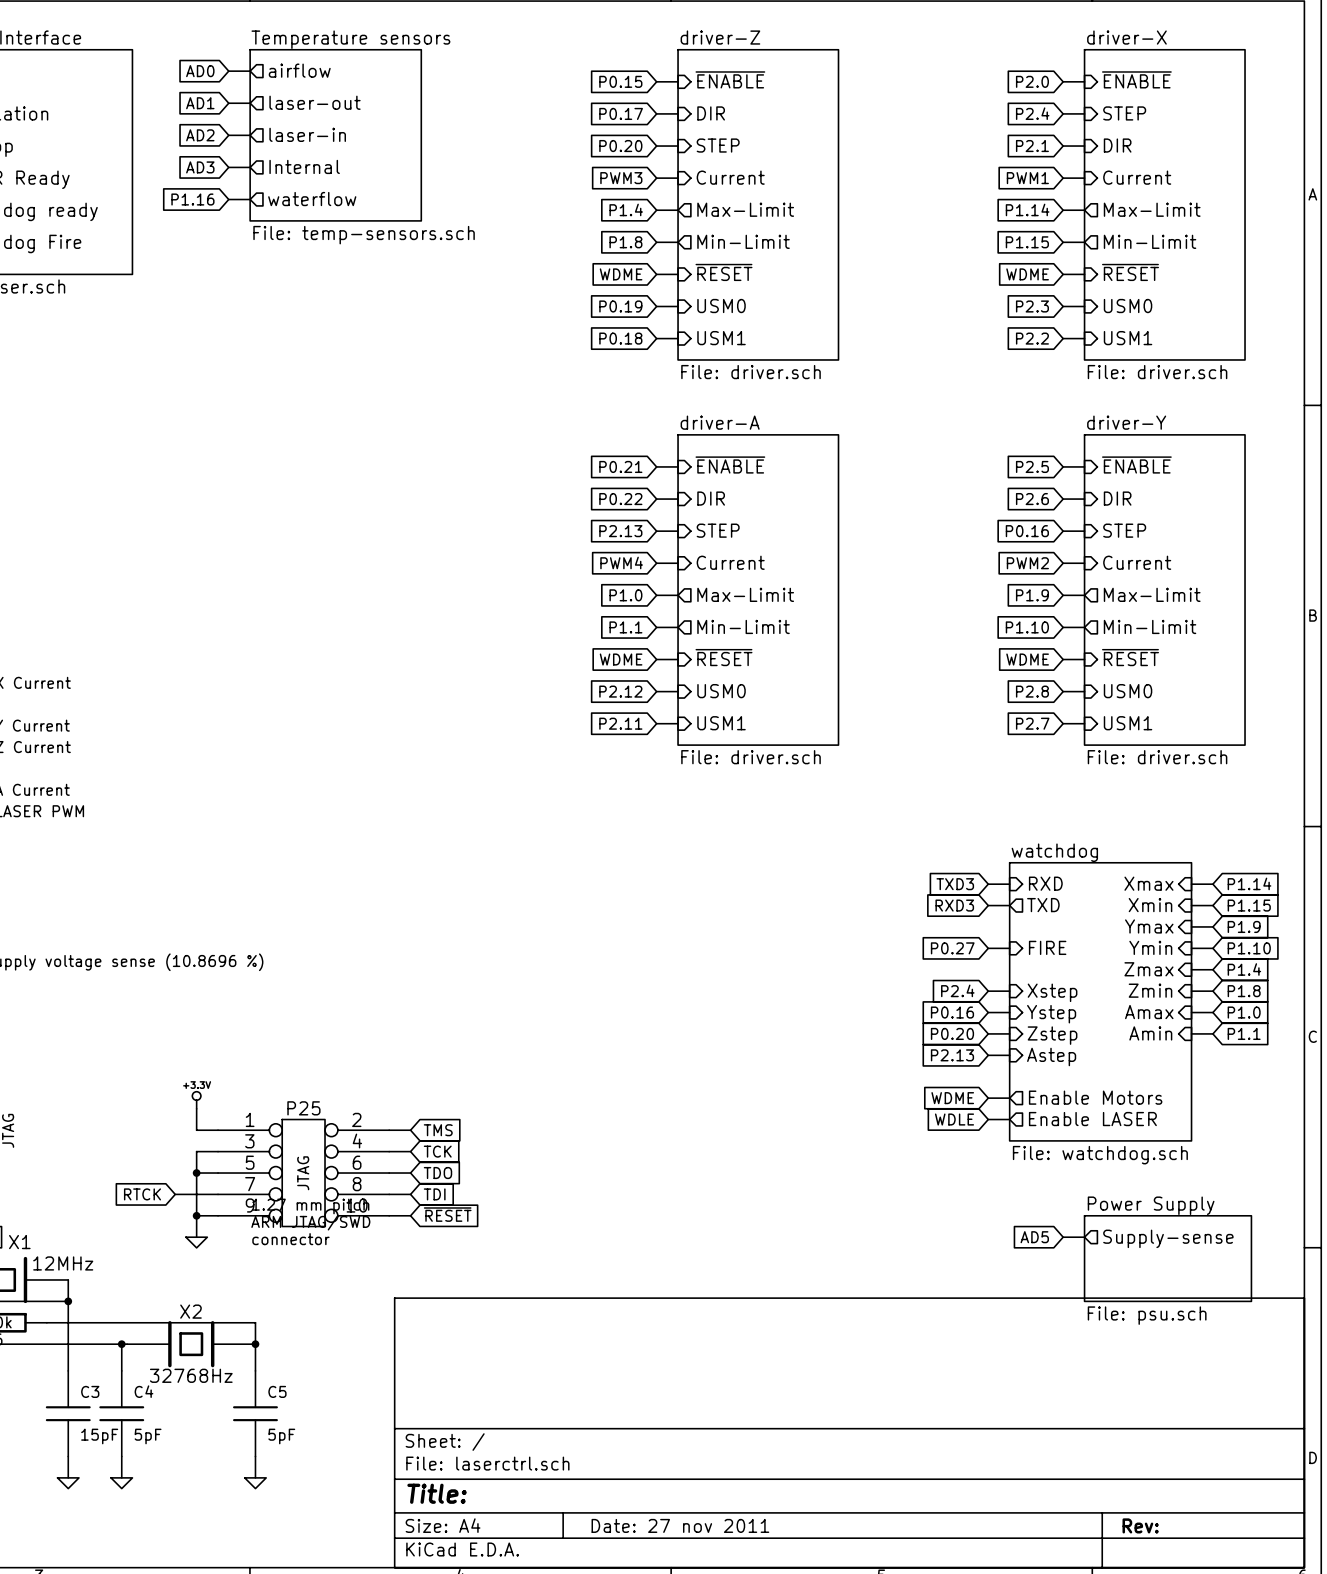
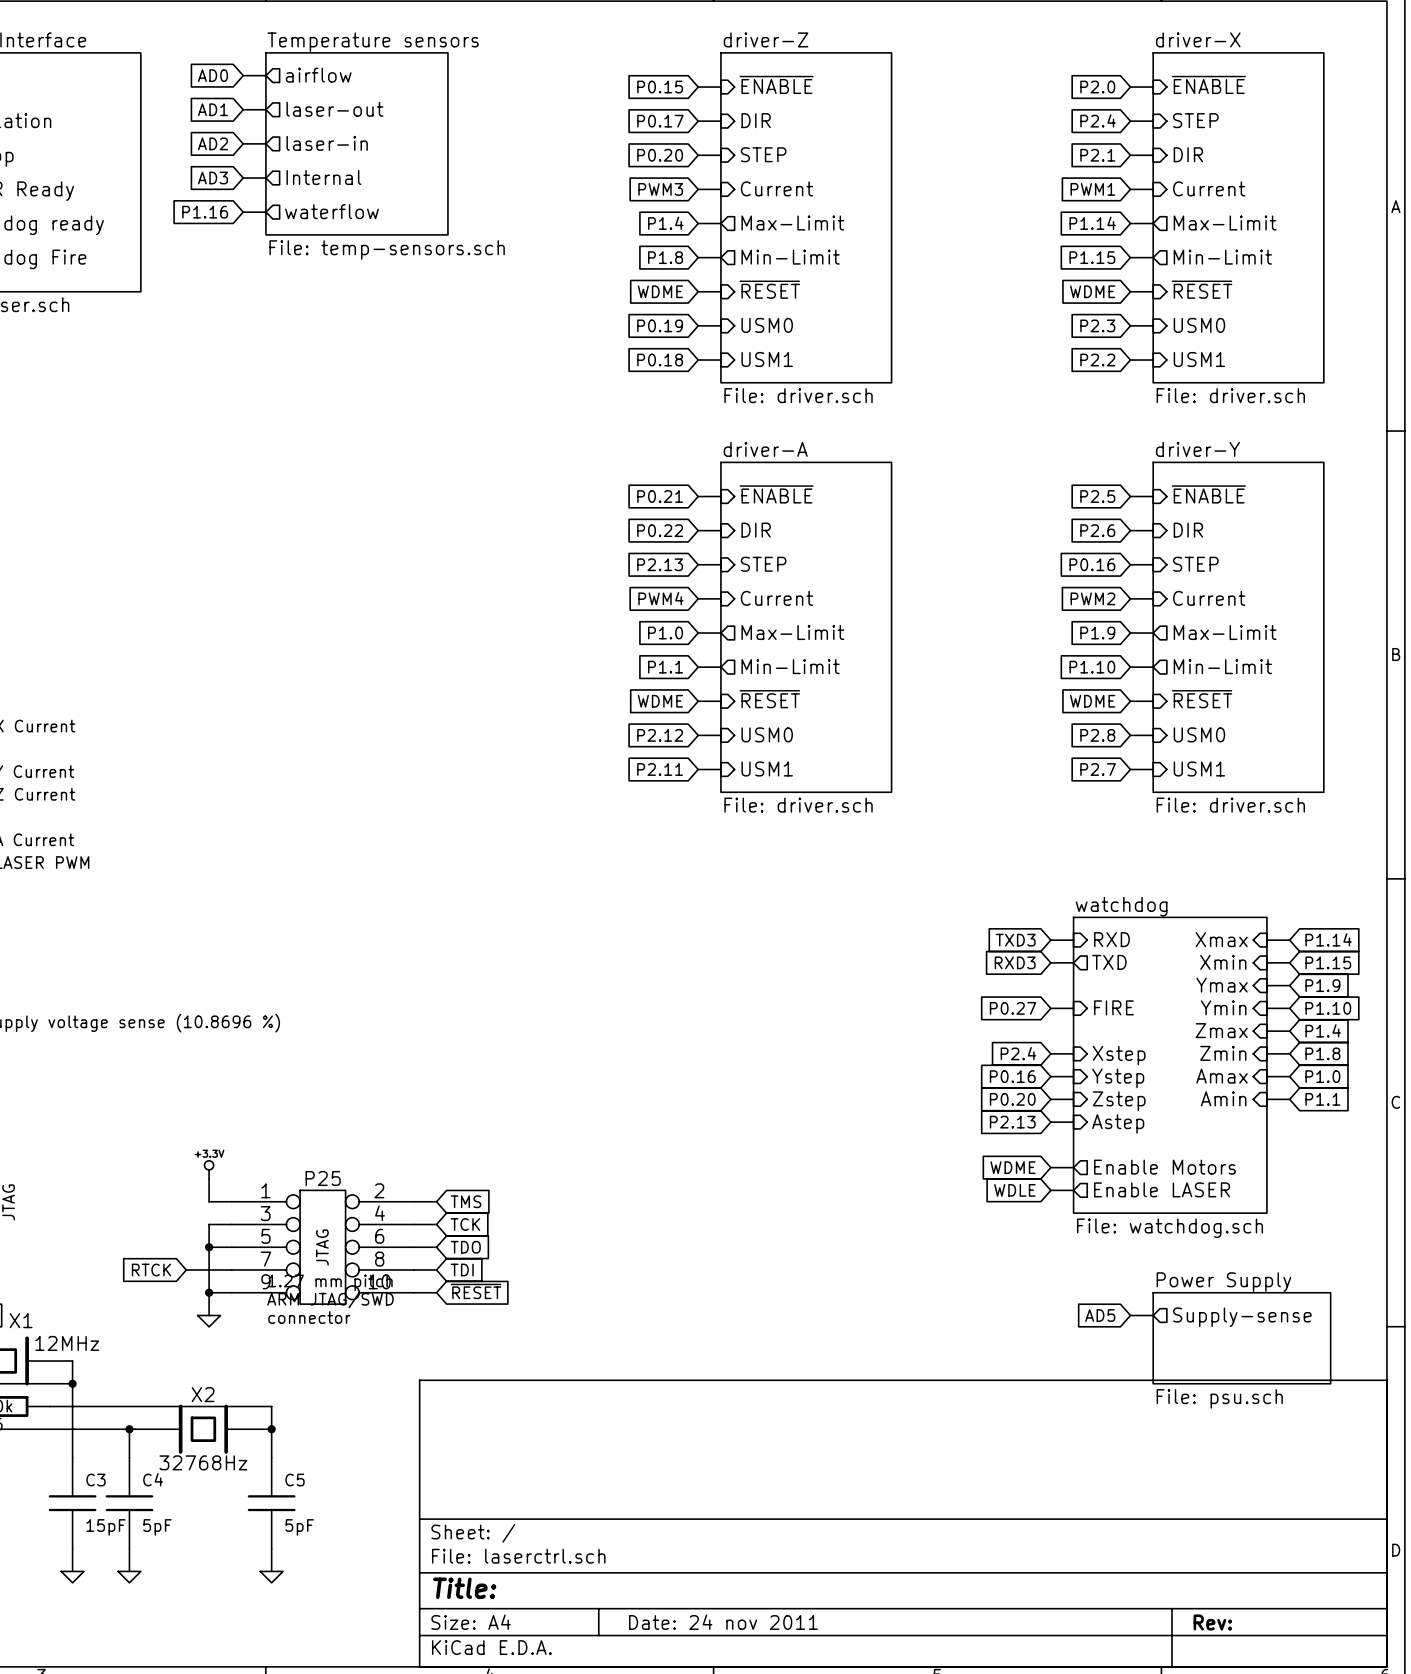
title block: Date: 27 nov 2011 (680, 1525) -> Date: 24 nov 2011 (723, 1622)

